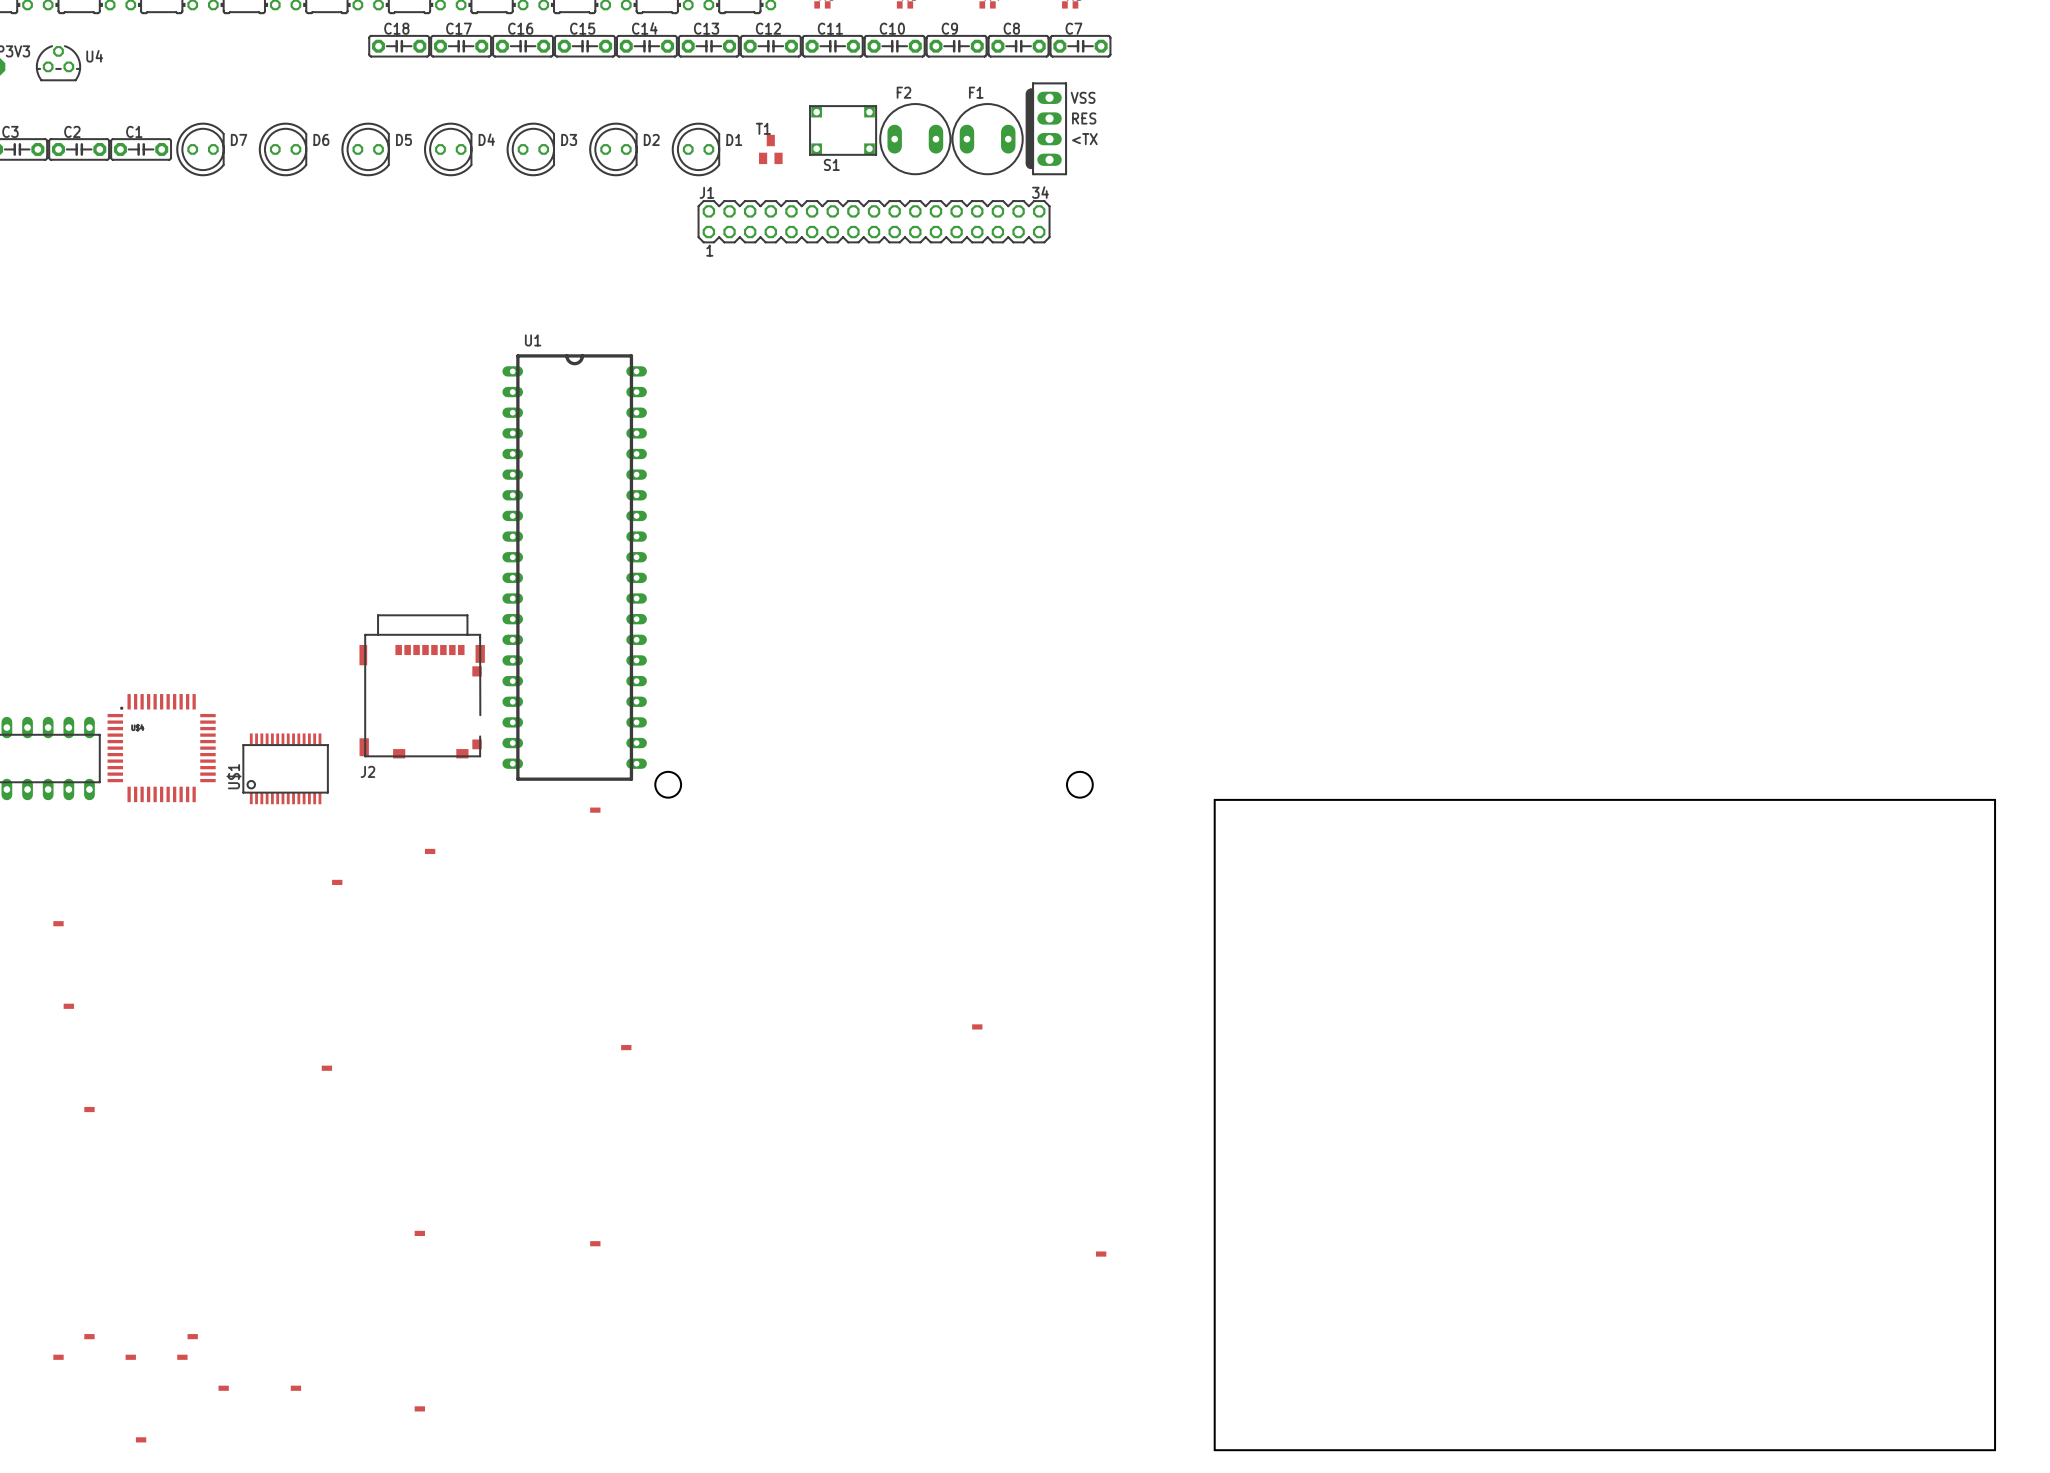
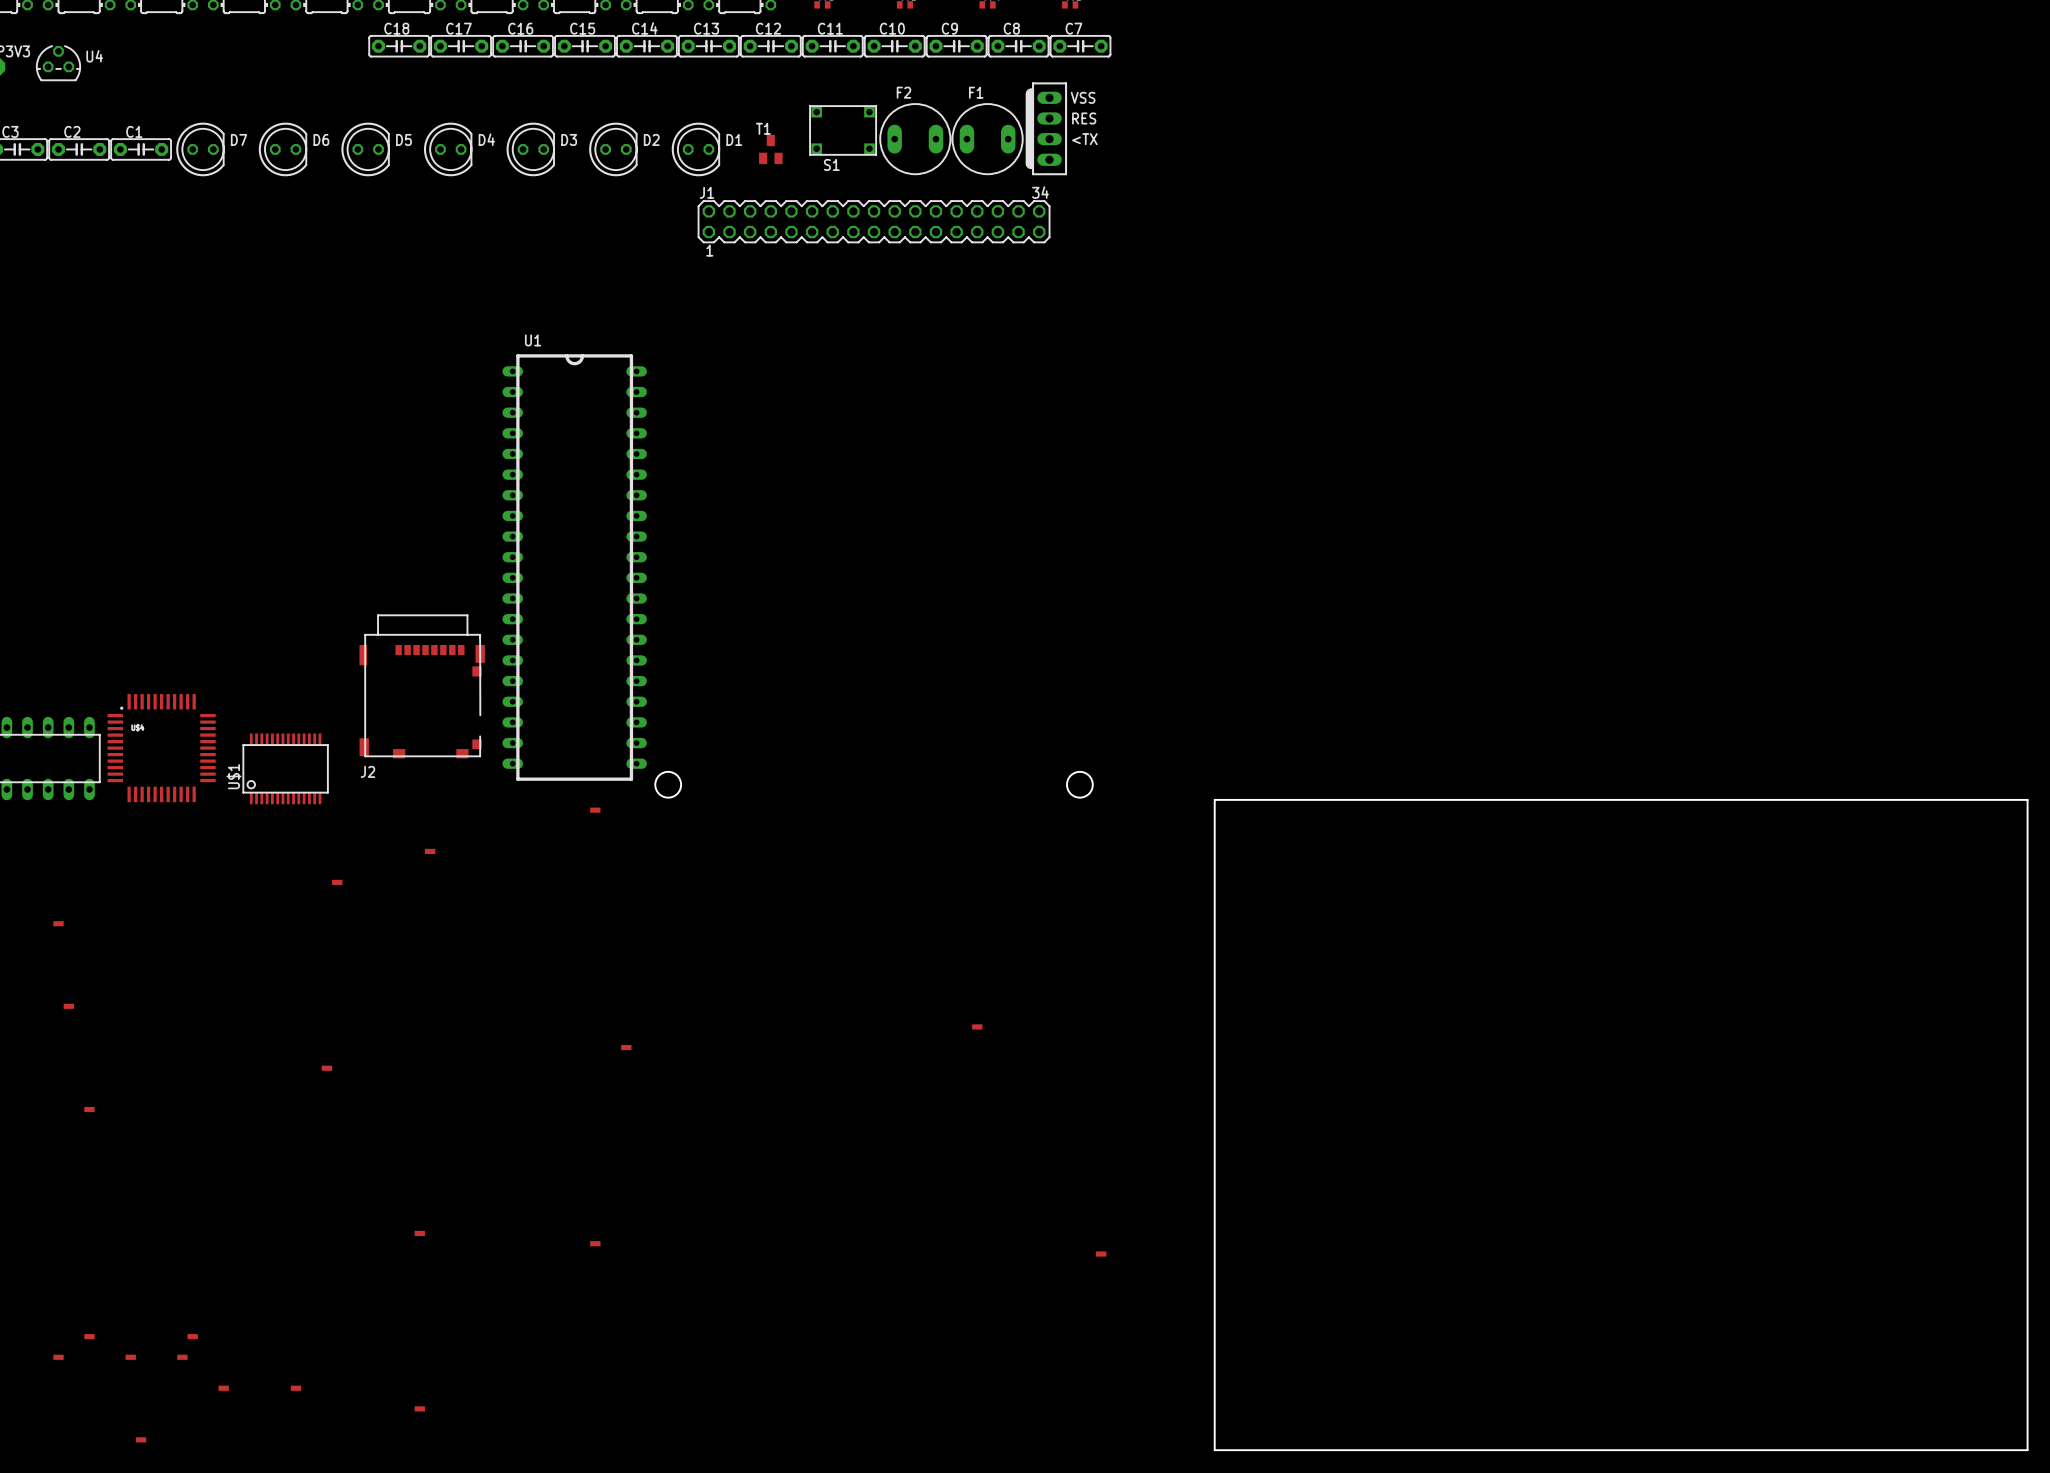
board edge: (1995, 799) (1995, 1450) -> (1995, 799) (2027, 799) (2027, 1450) (1995, 1450)

